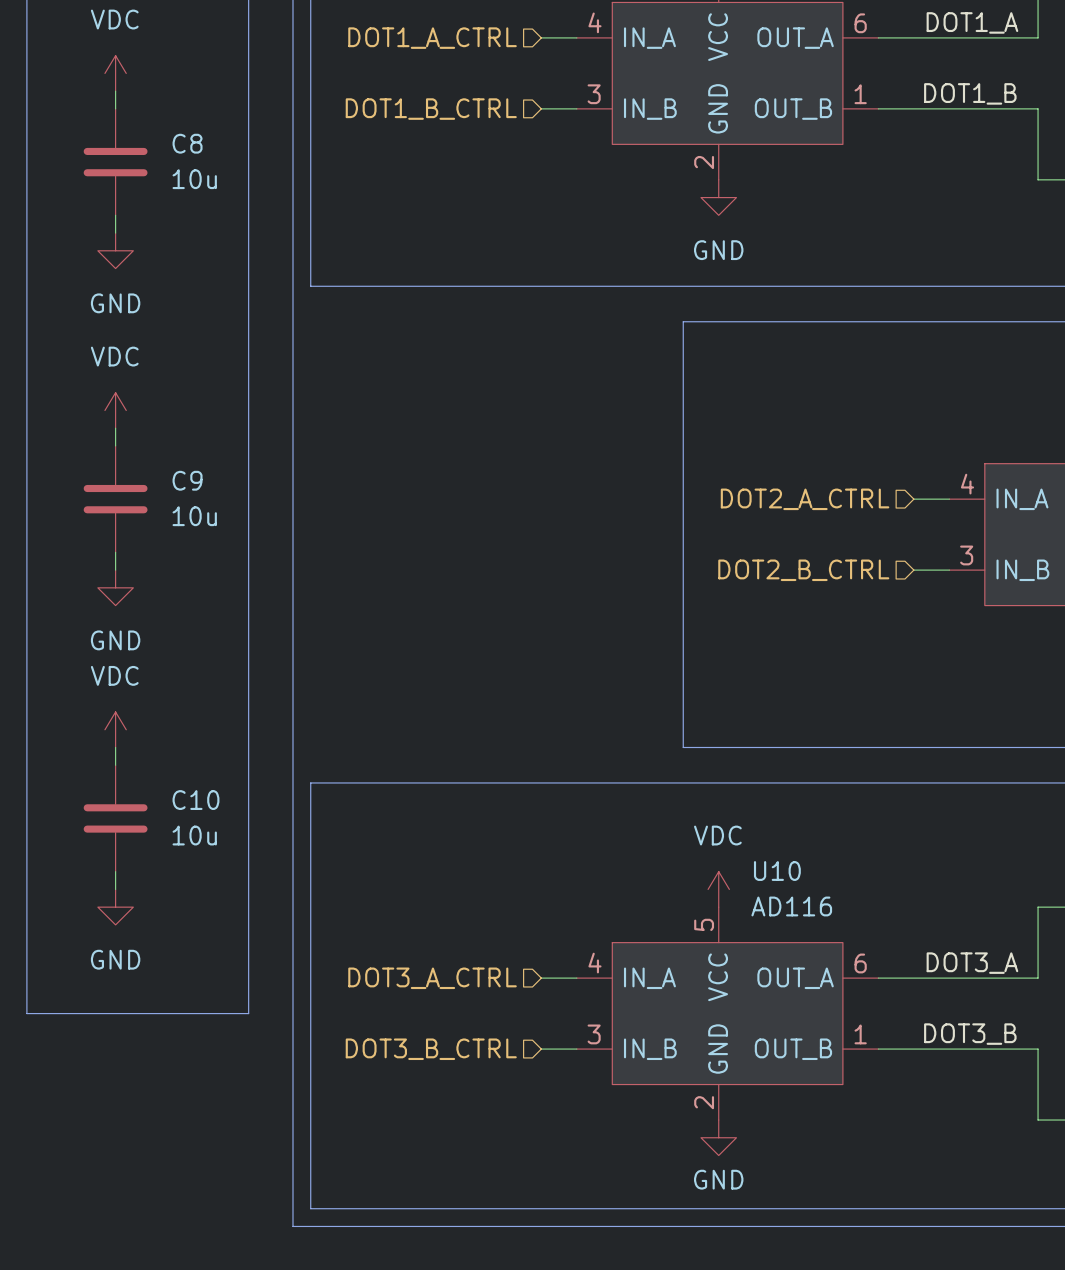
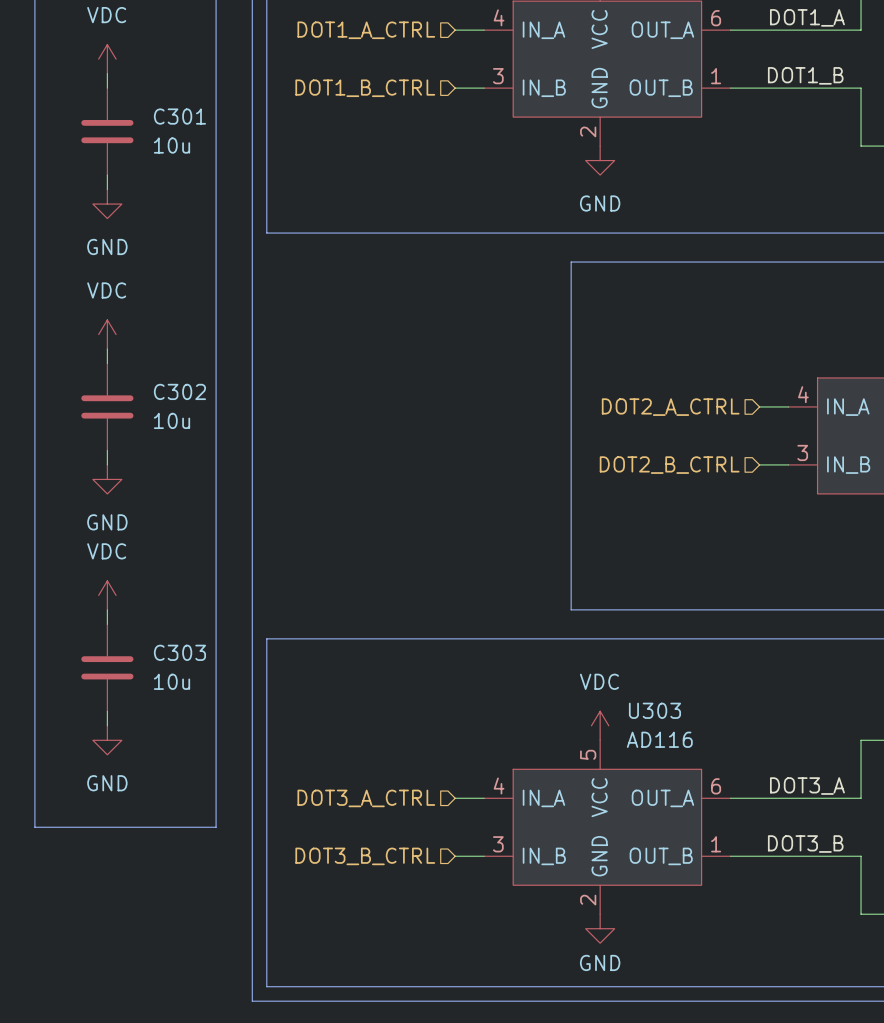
C8 name: C8 (187, 143) -> C301 (179, 116)
C9 name: C9 (187, 480) -> C302 (179, 391)
C10 name: C10 (195, 800) -> C303 (179, 652)
U10 name: U10 (777, 871) -> U303 (654, 710)

